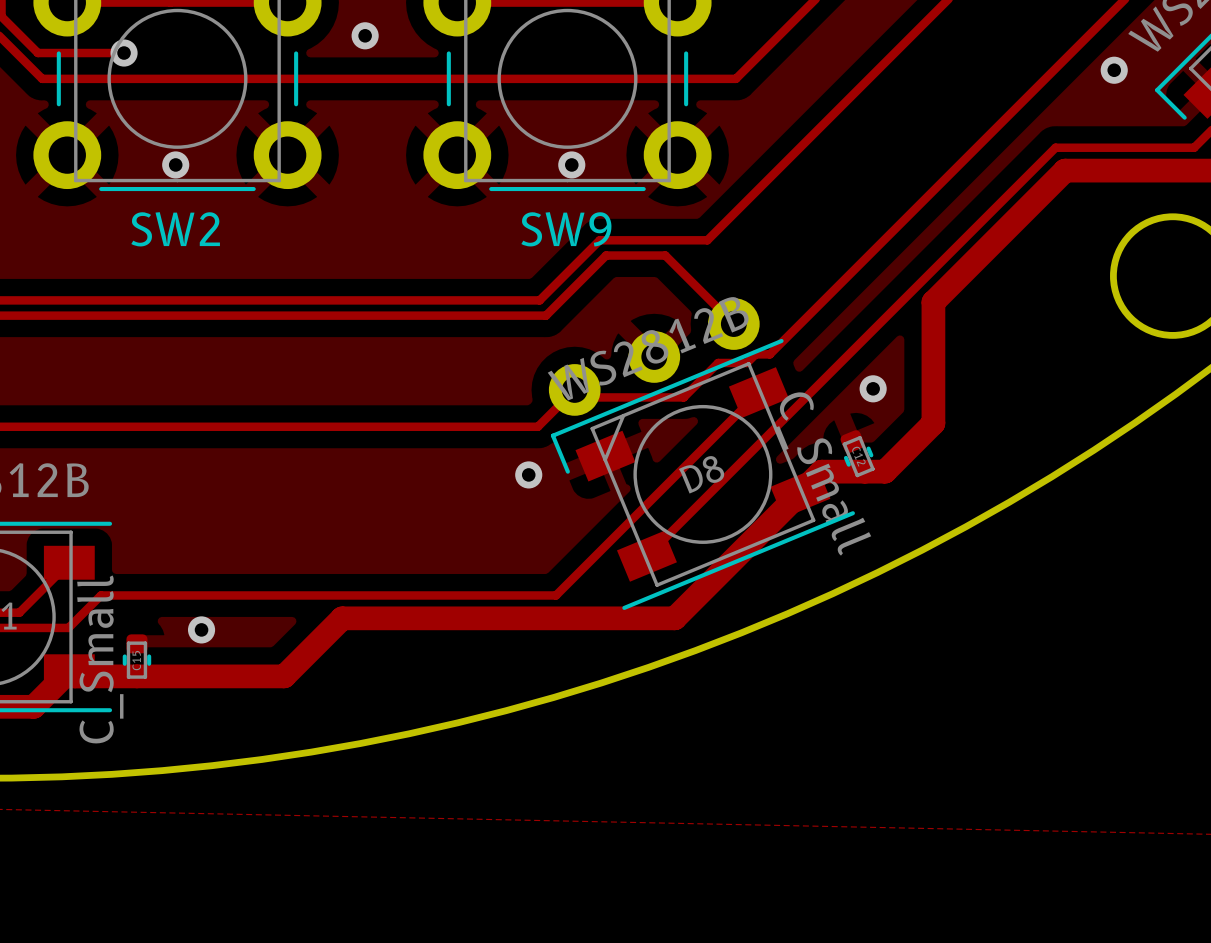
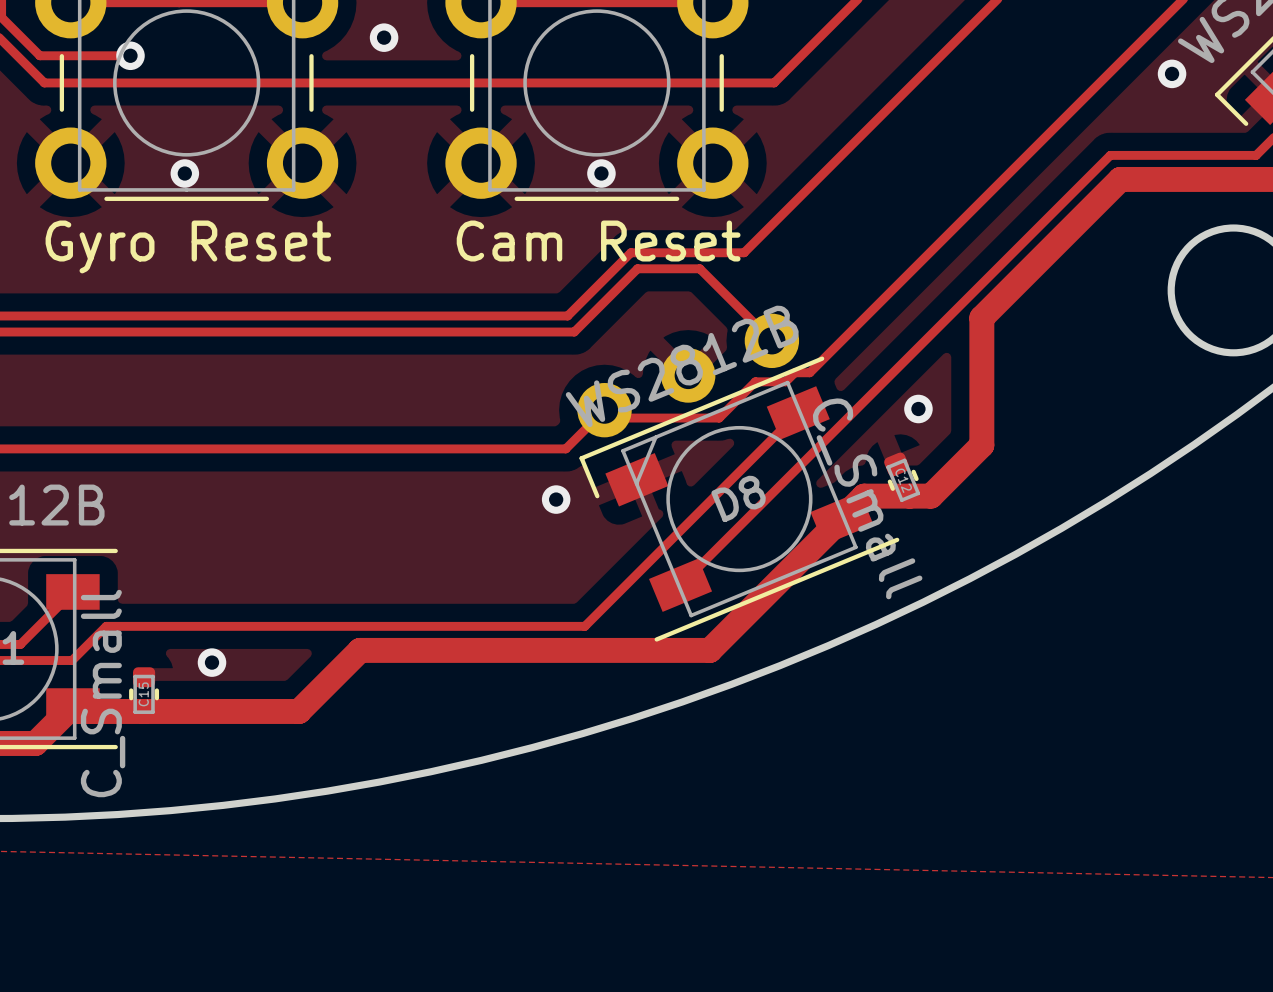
SW2 name: SW2 (175, 229) -> Gyro Reset (188, 246)
SW9 name: SW9 (566, 229) -> Cam Reset (598, 241)

